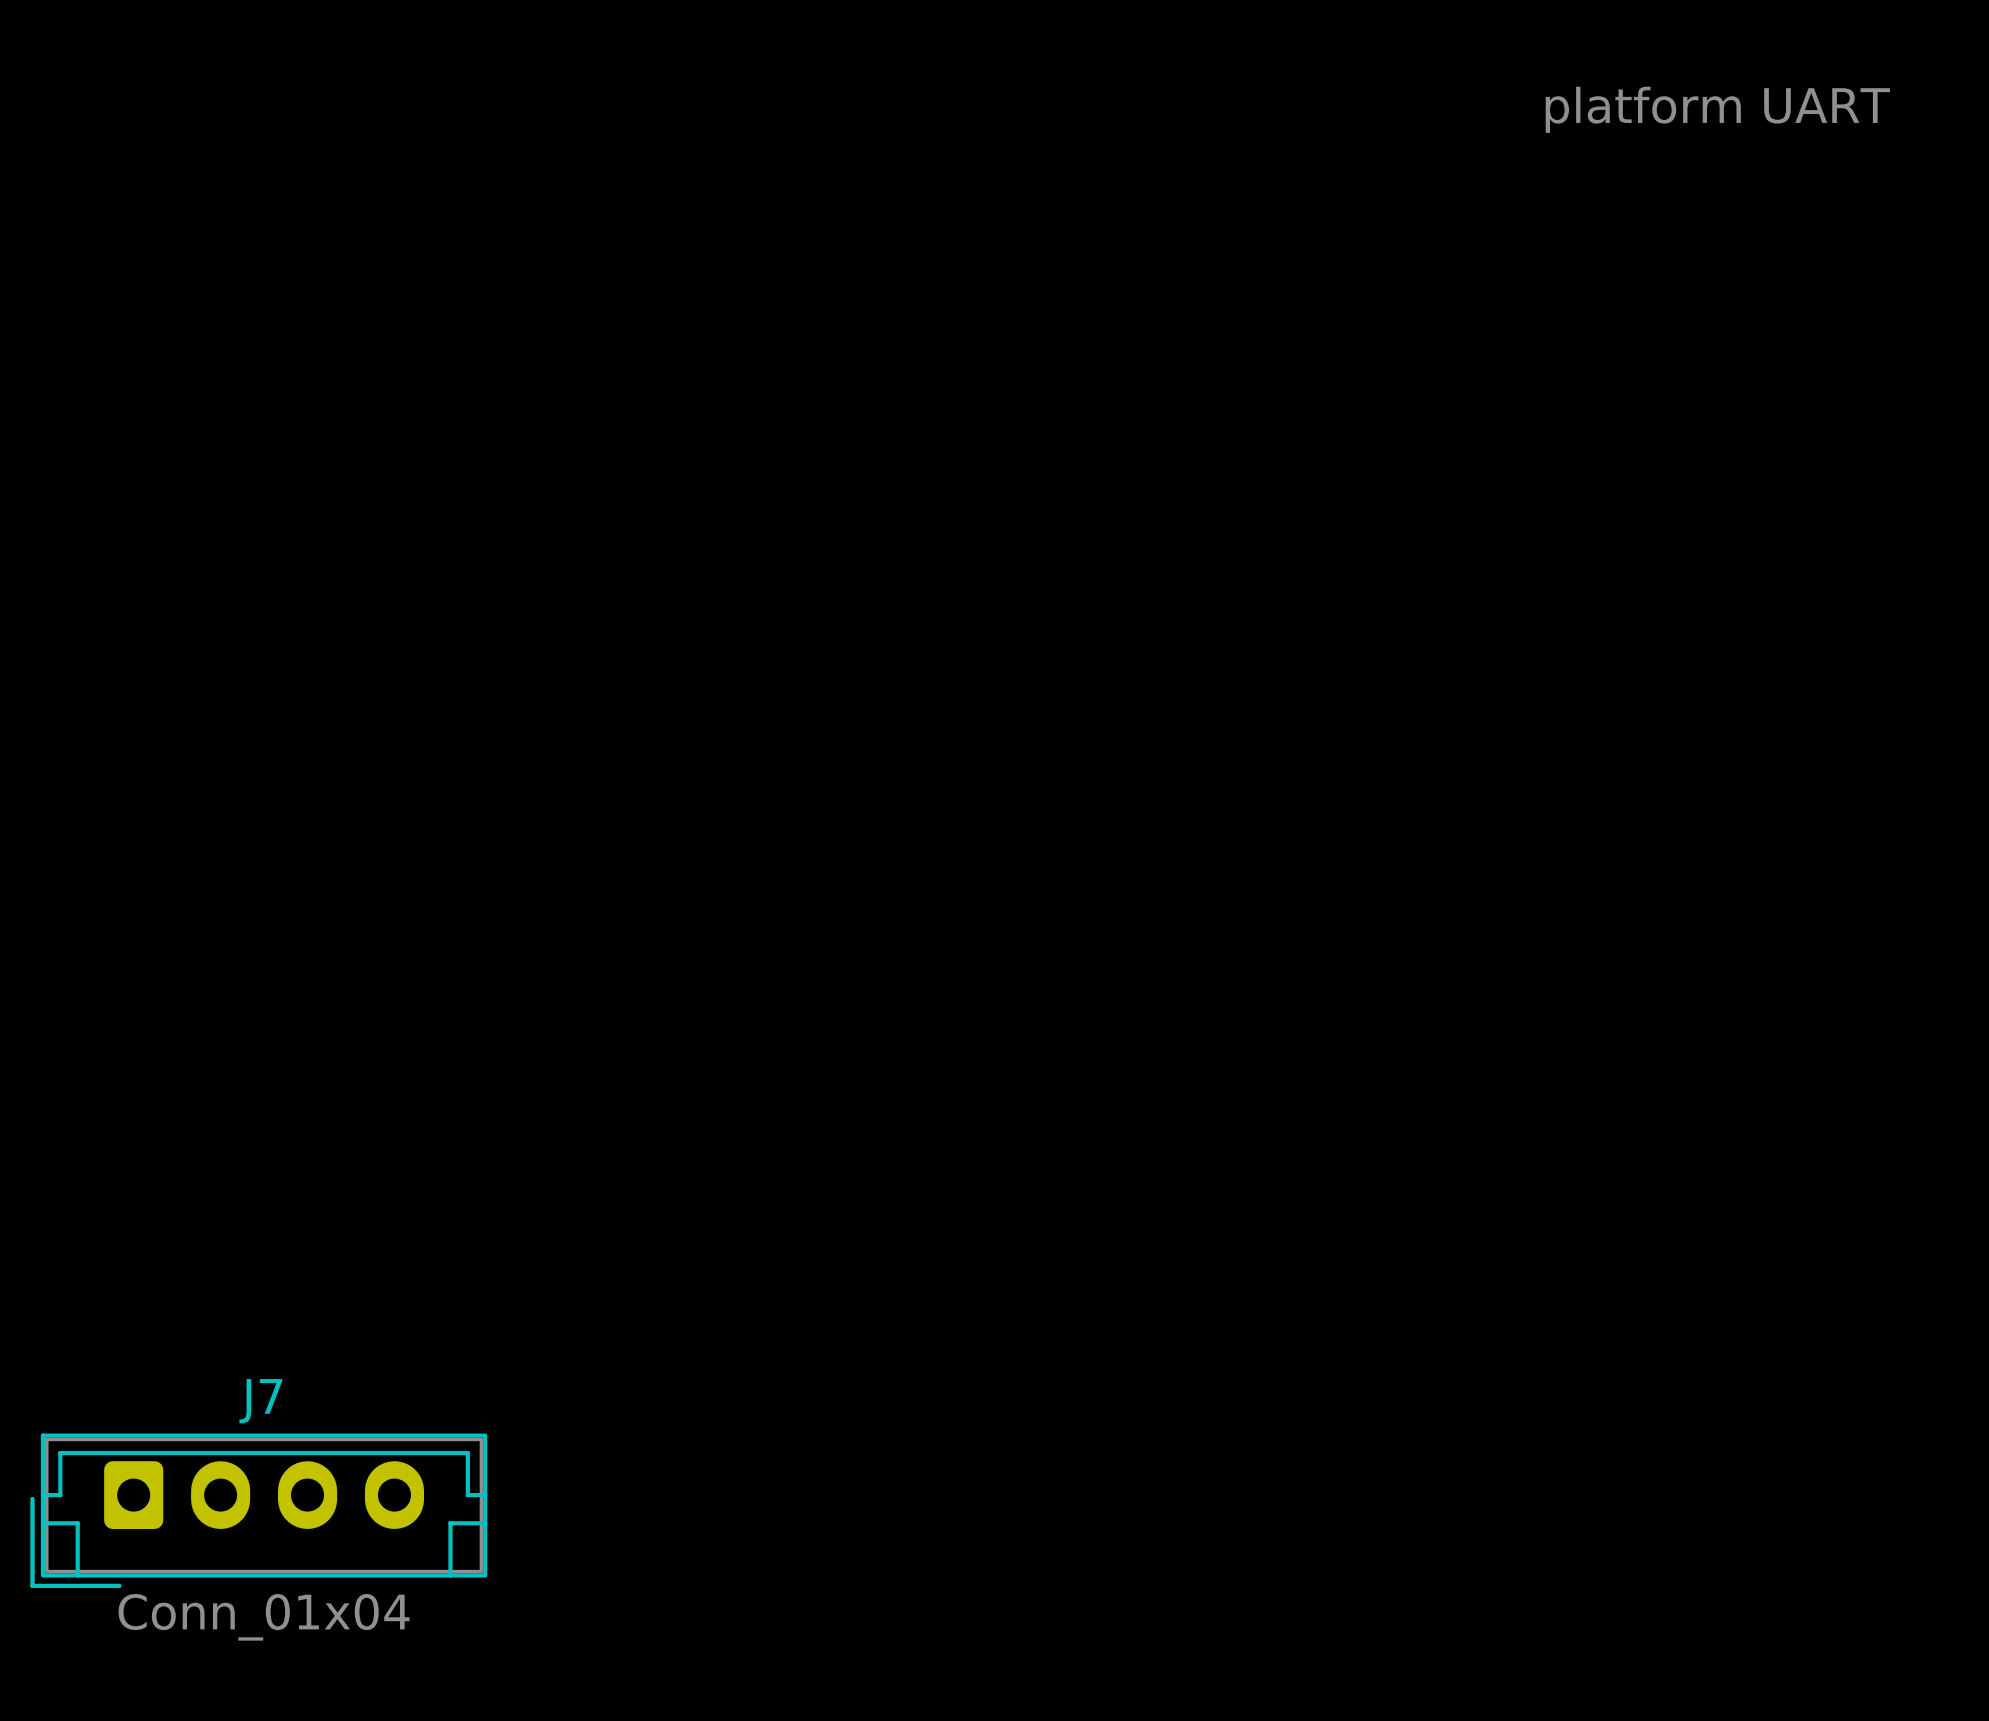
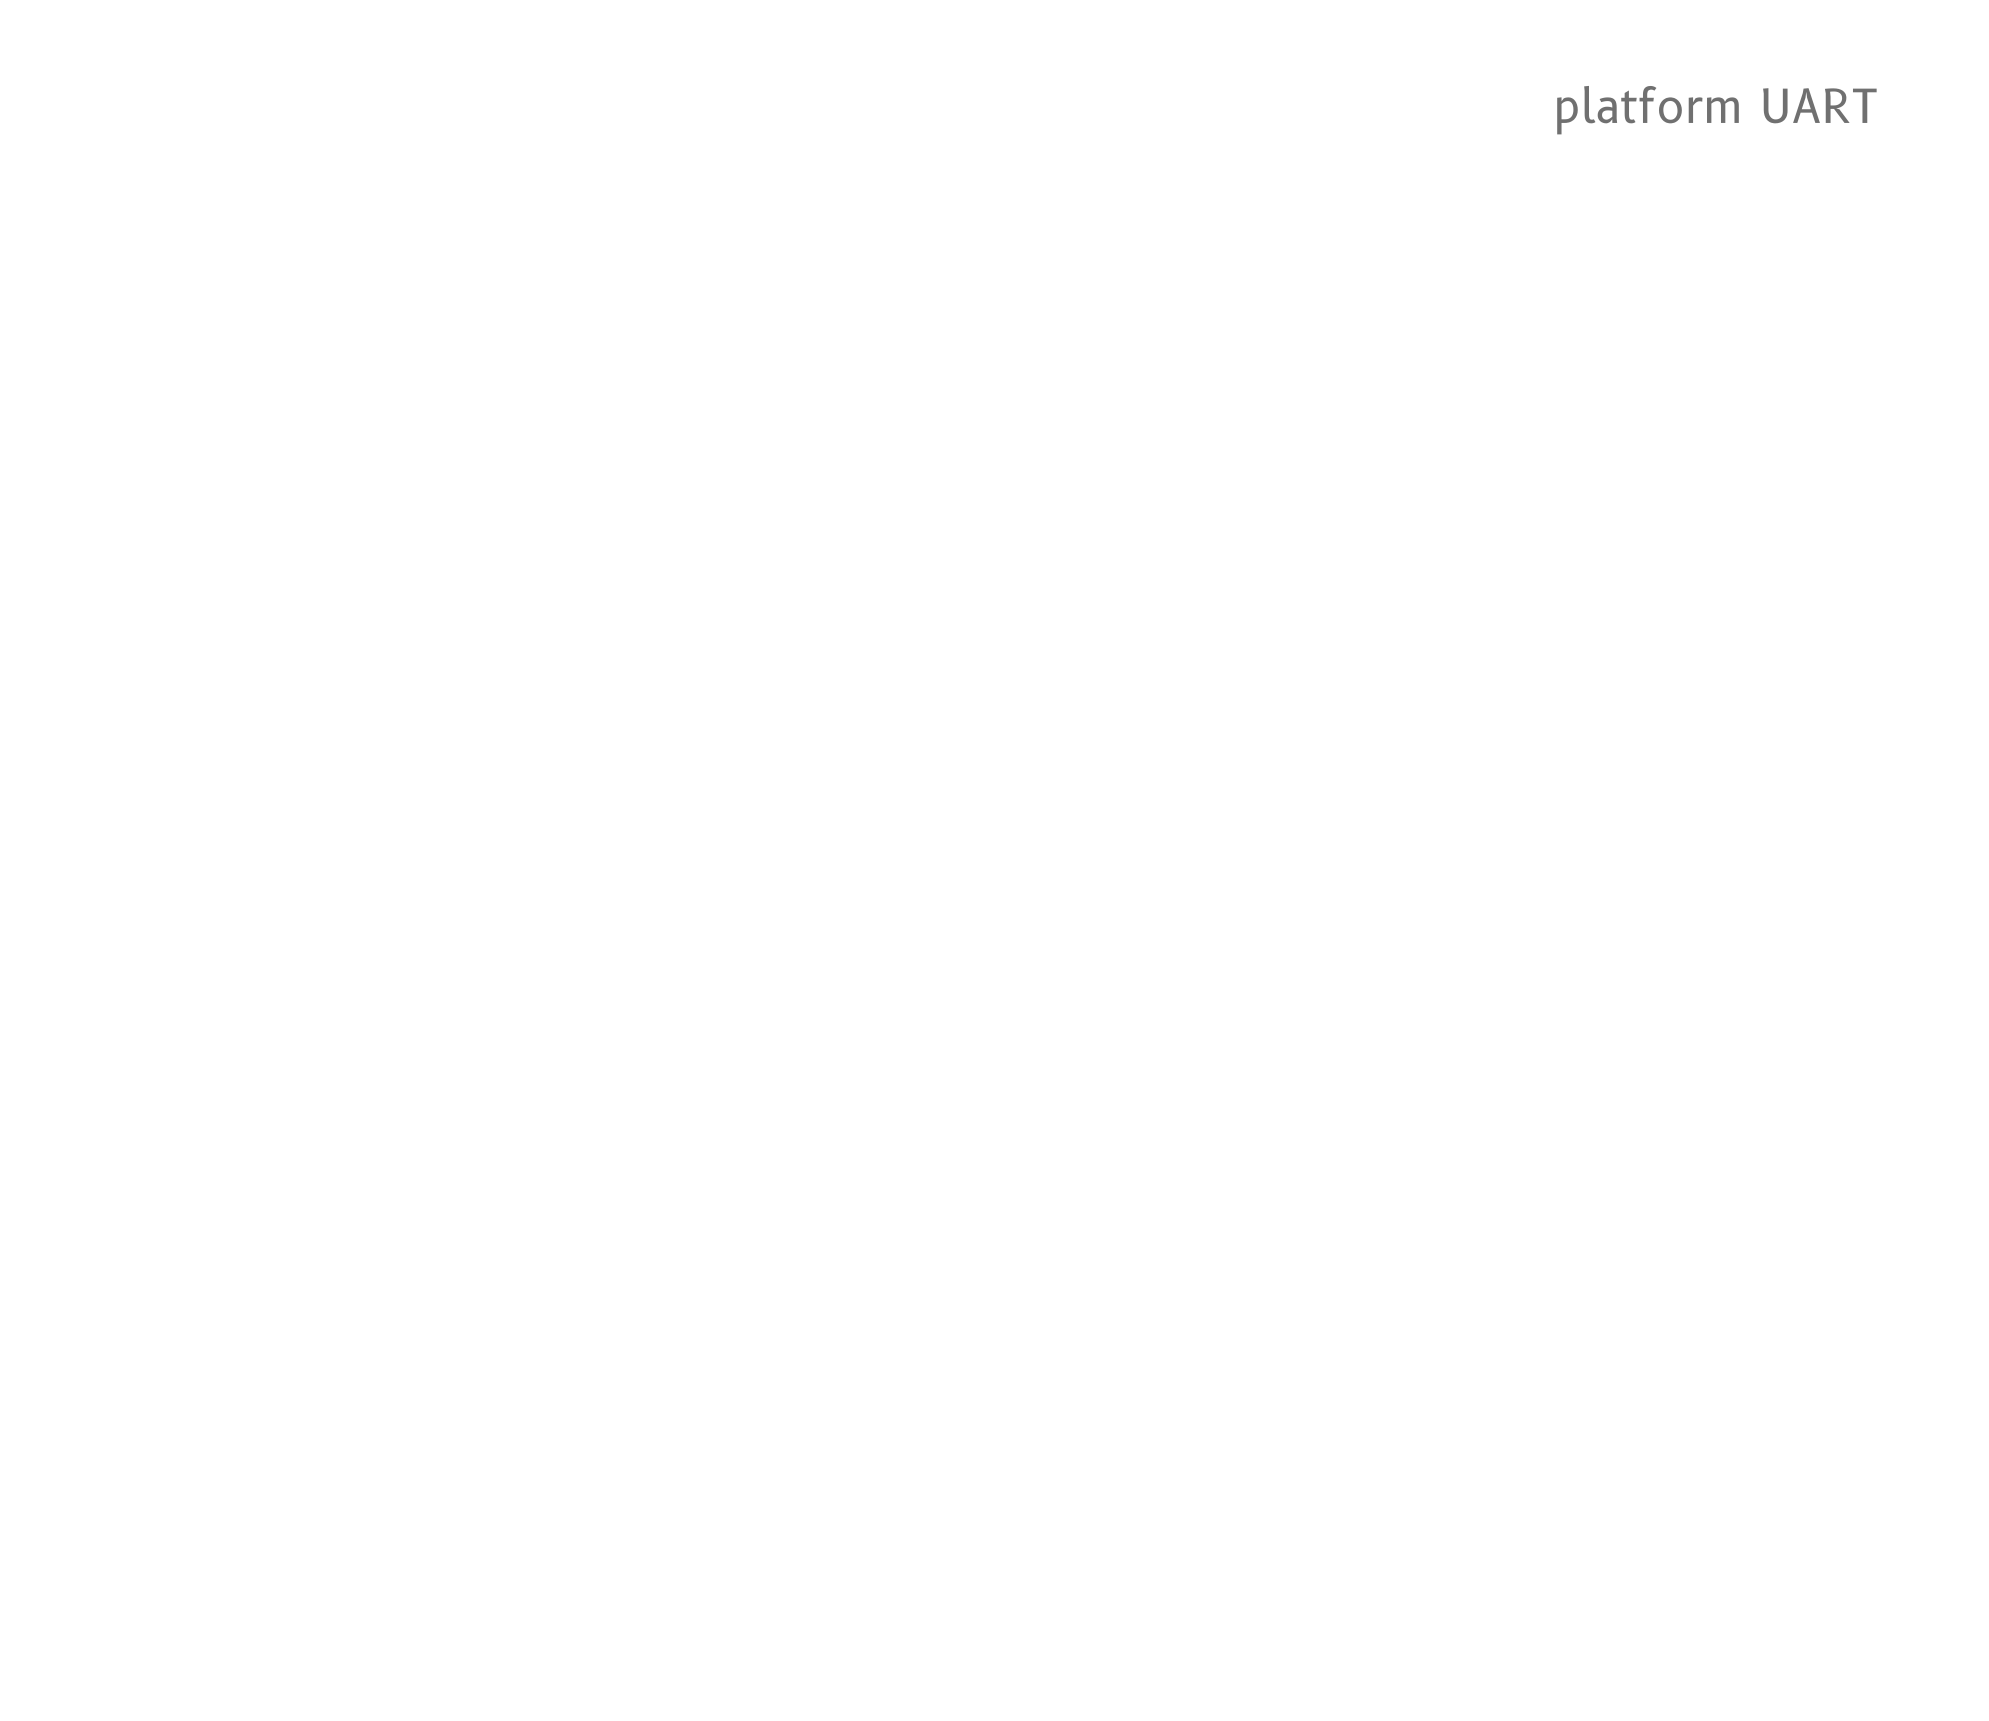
J7: Conn_01x04 (258, 1510) -> none

